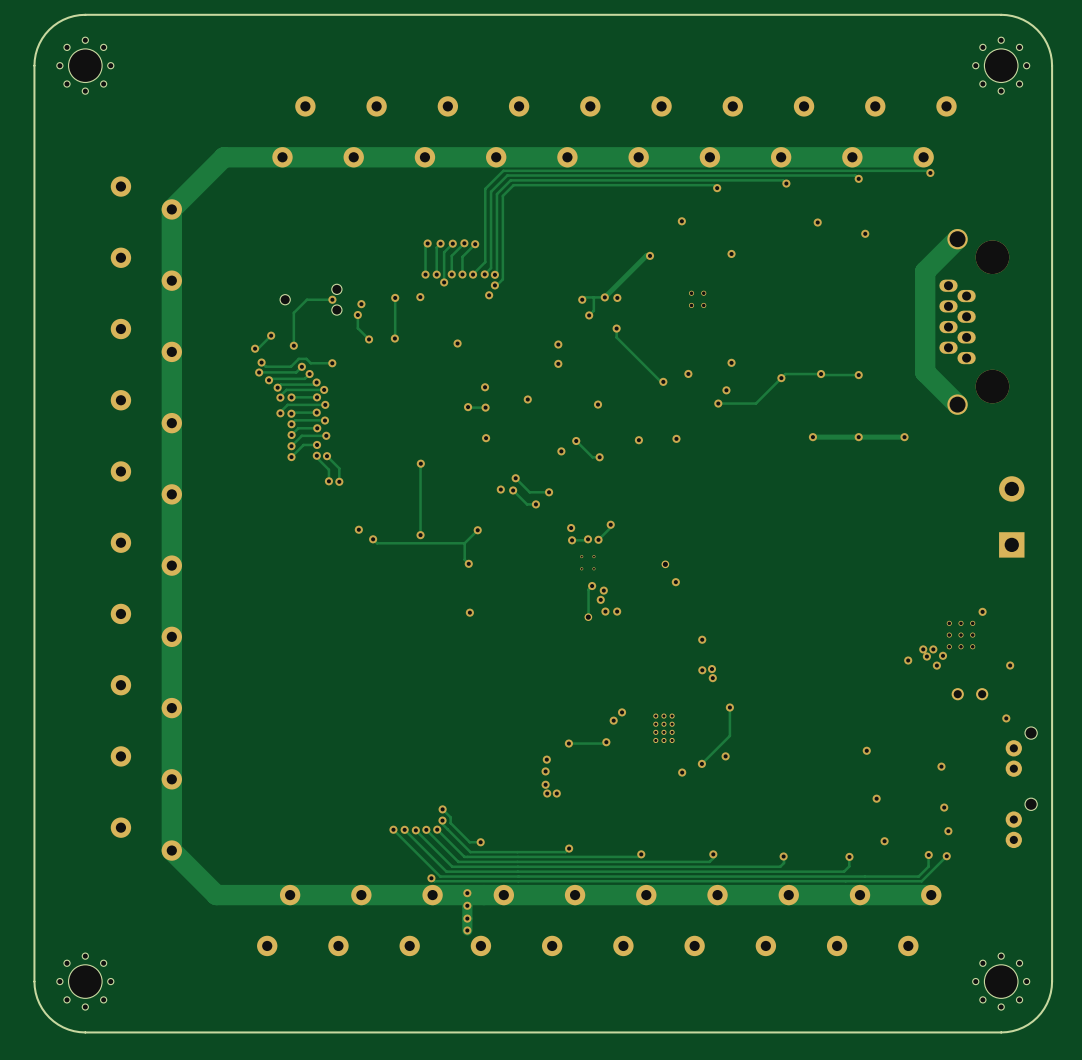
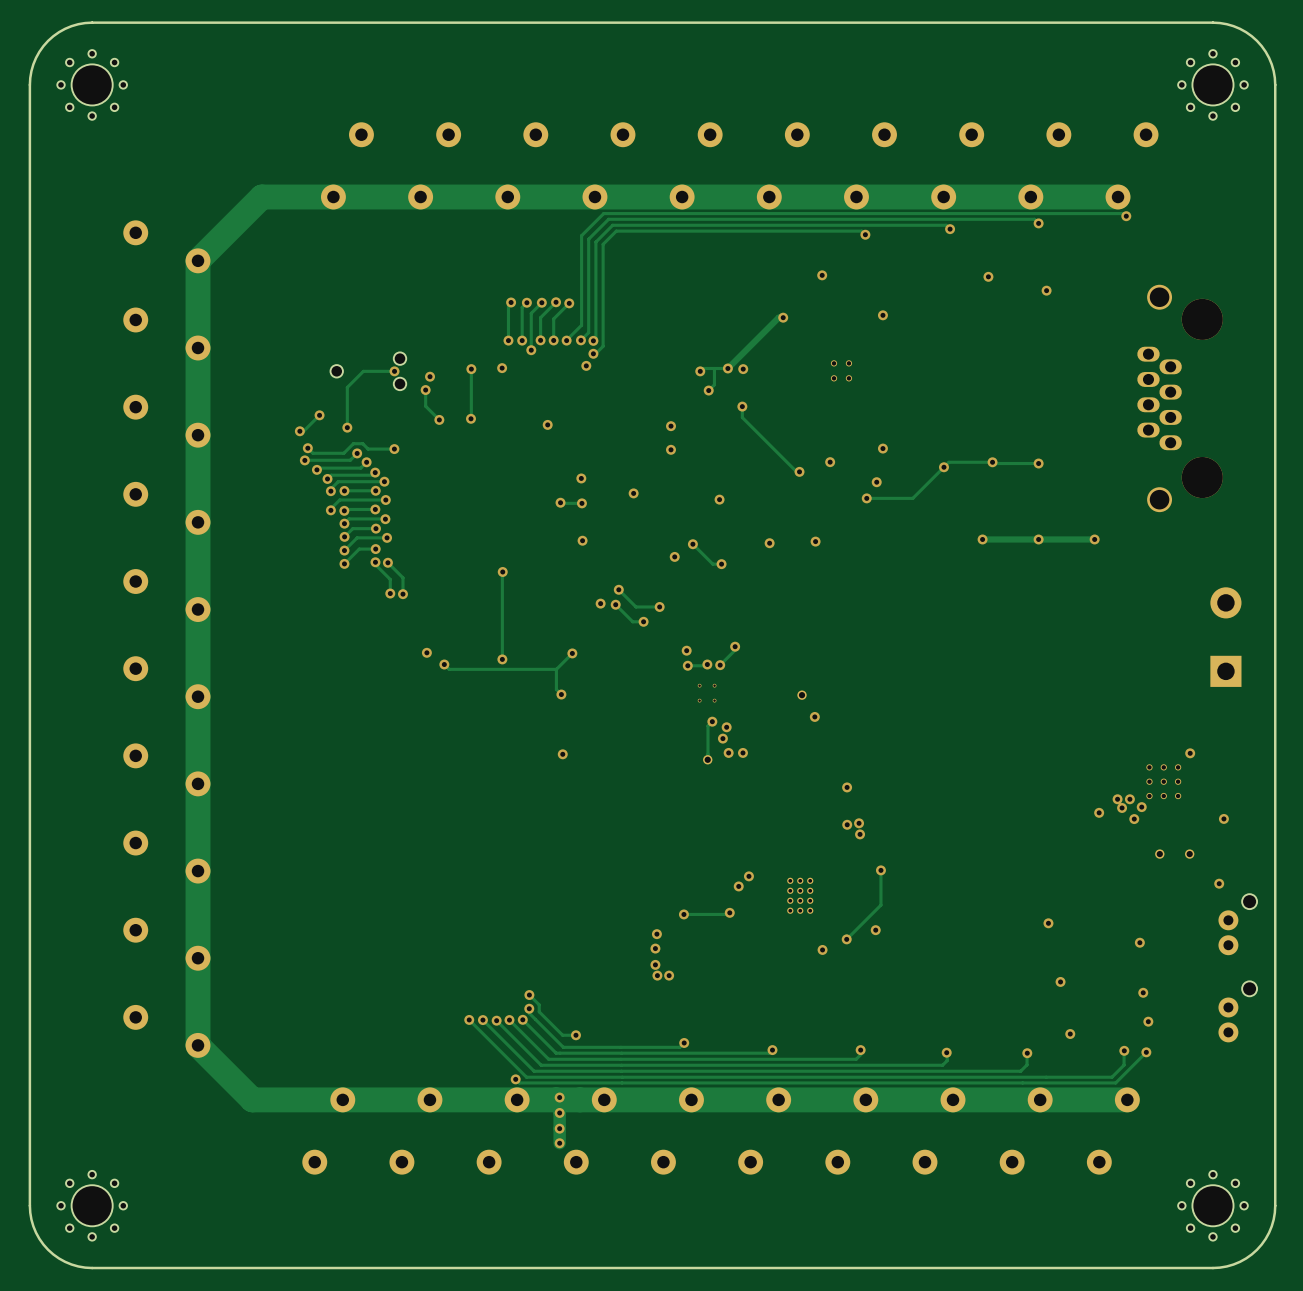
track: (957, 239) (925, 271) (925, 372) (957, 404) -> none
part: none -> (1159, 854)
part: (969, 694) -> none
part: none -> (1189, 854)

